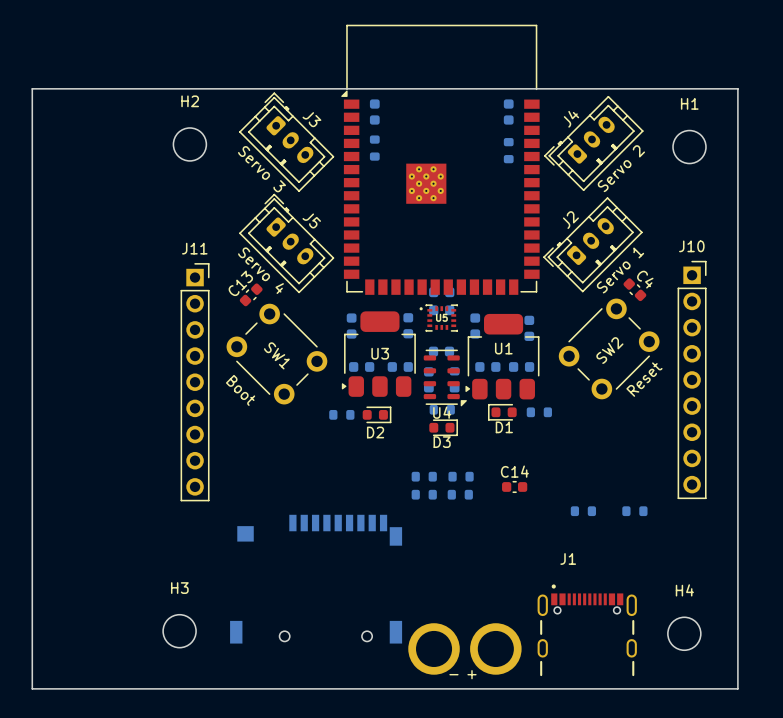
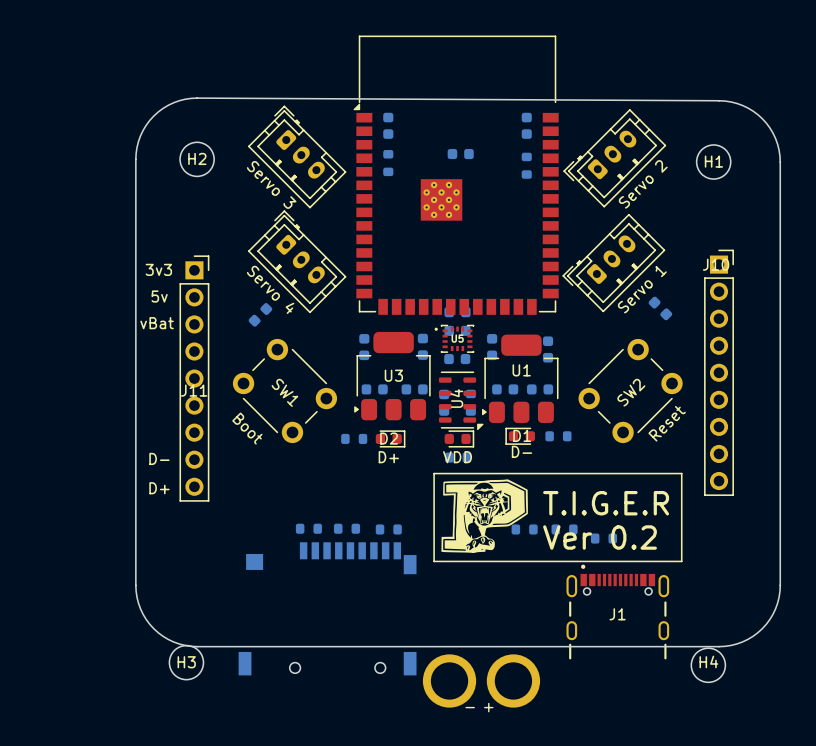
board edge: (32, 88) (737, 88) (737, 688) (32, 688) (32, 88) -> (197, 98) (173, 102) (153, 116) (143, 130) (136, 153) (135, 585) (140, 608) (153, 628) (173, 641) (197, 646) (719, 646) (742, 641) (762, 628) (775, 608) (780, 585) (780, 162) (775, 138) (762, 118) (742, 105) (719, 100) (197, 98)
H2 name position: H2 (190, 101) -> H2 (197, 158)
H1 name position: H1 (689, 103) -> H1 (713, 161)
J3 name: J3 (311, 119) -> none
J4 name: J4 (571, 119) -> none
J5 name: J5 (311, 220) -> none
J2 name: J2 (570, 220) -> none
J11 name position: J11 (194, 248) -> J11 (194, 390)
text: none -> 3v3 (158, 269)
text: none -> 5v (159, 296)
C4 side: top (634, 289) -> bottom (460, 154)
C13 side: top (251, 294) -> bottom (260, 314)
text: none -> vBat (157, 323)
SW2 position: (609, 348) -> (630, 391)
part position: (441, 351) -> (457, 359)
SW1 position: (276, 354) -> (284, 391)
text position: Reset (644, 379) -> Reset (667, 423)
J10 position: (692, 379) -> (719, 372)
J11 position: (195, 382) -> (194, 378)
text position: Boot (240, 390) -> Boot (247, 428)
part position: (442, 409) -> (458, 457)
U4 name rotation: 0° (442, 412) -> 90° counterclockwise (456, 398)
U4 name position: U4 (442, 412) -> U4 (456, 398)
VDD: none -> (459, 438)
D3: (443, 427) -> none
D1 name position: D1 (504, 427) -> D1 (522, 435)
text: none -> D- (521, 451)
D2 name position: D2 (375, 432) -> D2 (389, 438)
text: none -> D+ (388, 457)
text: none -> D- (159, 458)
line: none -> (434, 473) (681, 473) (681, 561) (434, 561) (434, 473)
drawing: none -> [441, 479, 528, 554]
text: none -> D+ (159, 488)
part: (424, 476) -> none
part: (461, 476) -> none
text: none -> T.I.G.E.R (606, 503)
C14 side: top (514, 486) -> bottom (660, 308)
part: (424, 494) -> none
part: (460, 494) -> none
part: none -> (308, 528)
part: none -> (347, 528)
part: none -> (388, 529)
part: none -> (524, 529)
part: none -> (564, 529)
text: none -> Ver 0.2 (600, 537)
part: (634, 511) -> none
J1 name position: J1 (568, 558) -> J1 (617, 614)
H3 name position: H3 (179, 588) -> H3 (186, 662)
H4 name position: H4 (684, 590) -> H4 (708, 661)
J1 position: (587, 630) -> (617, 612)

